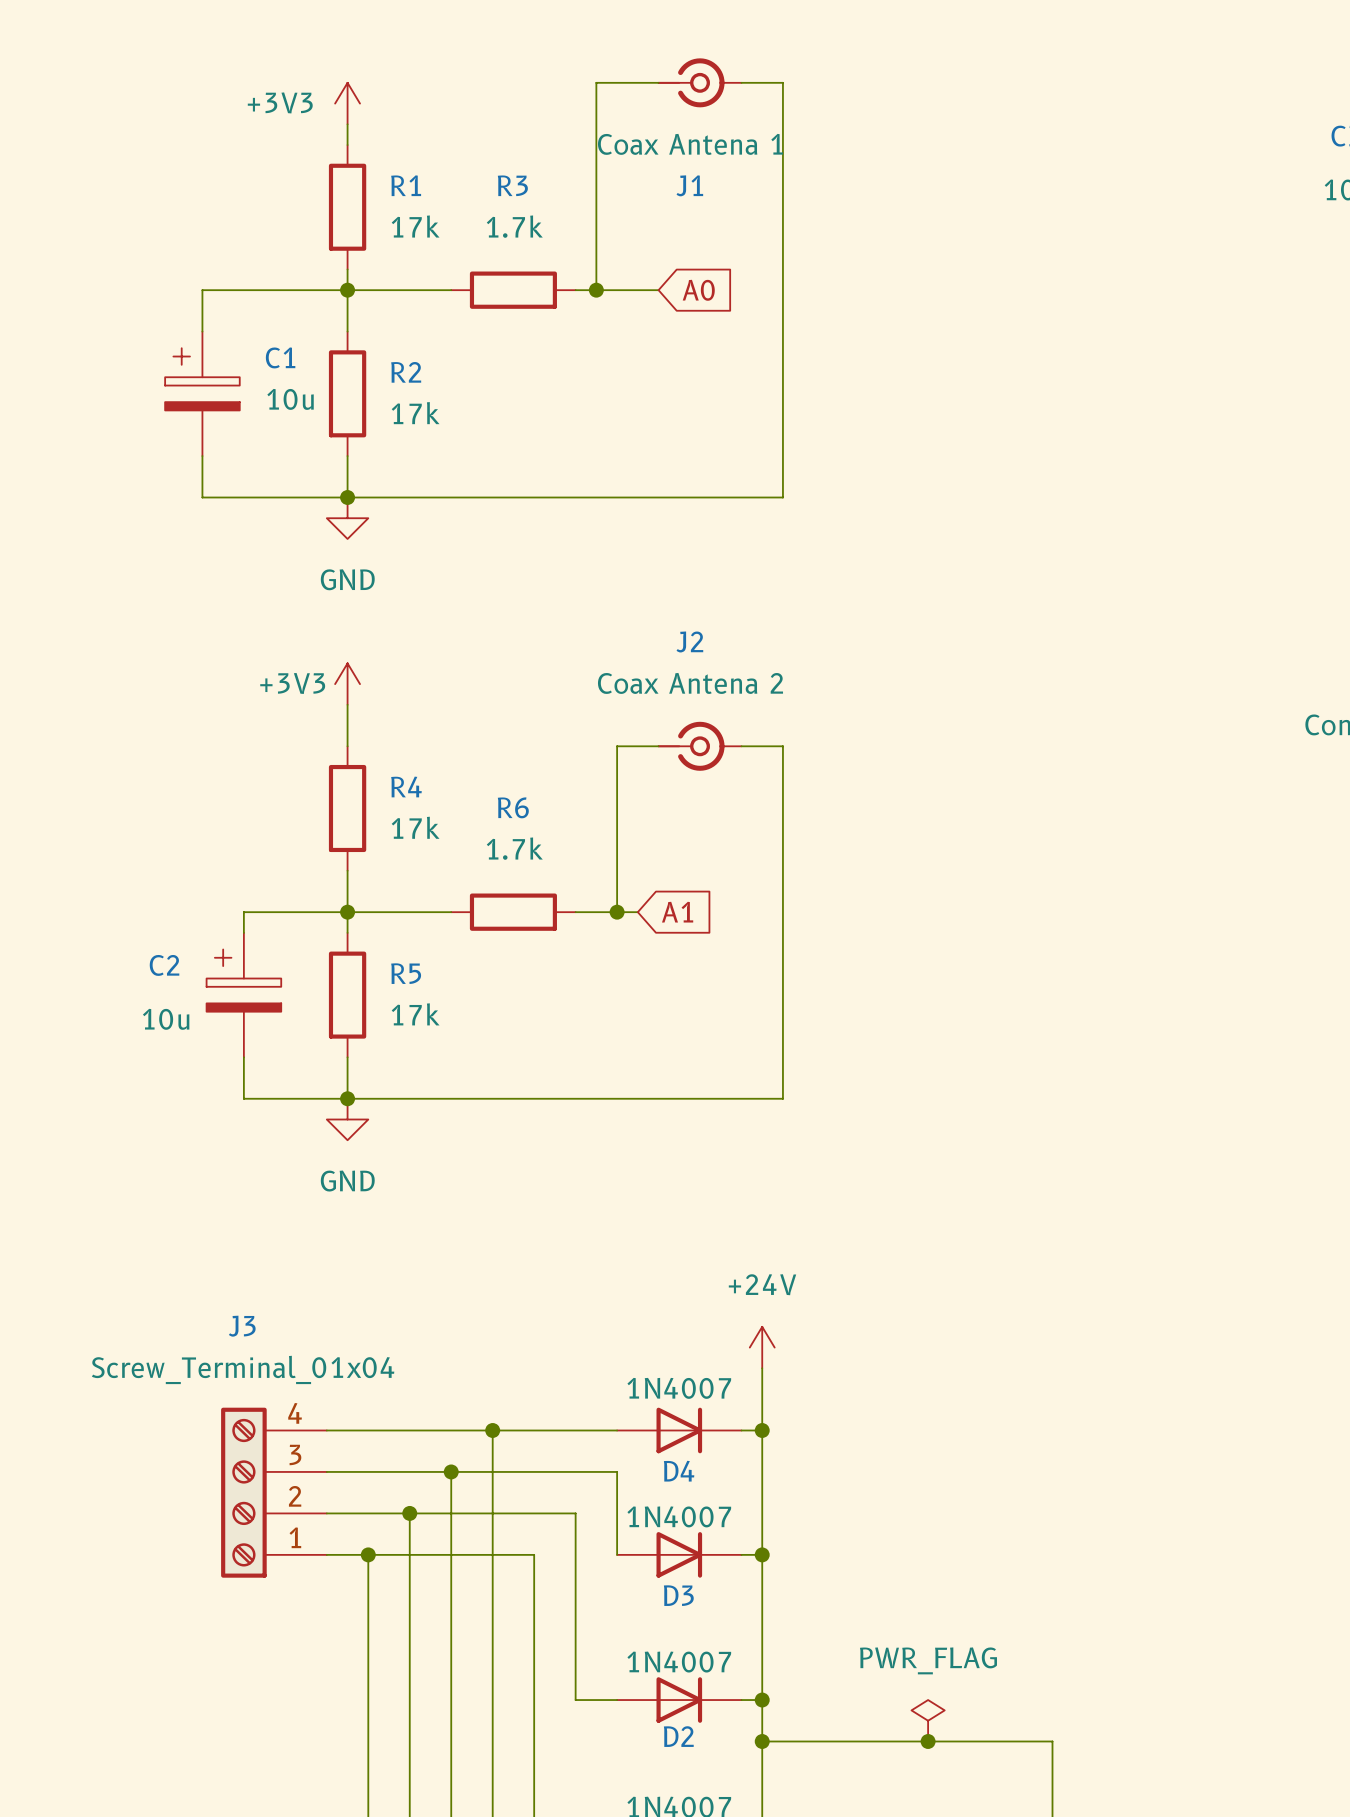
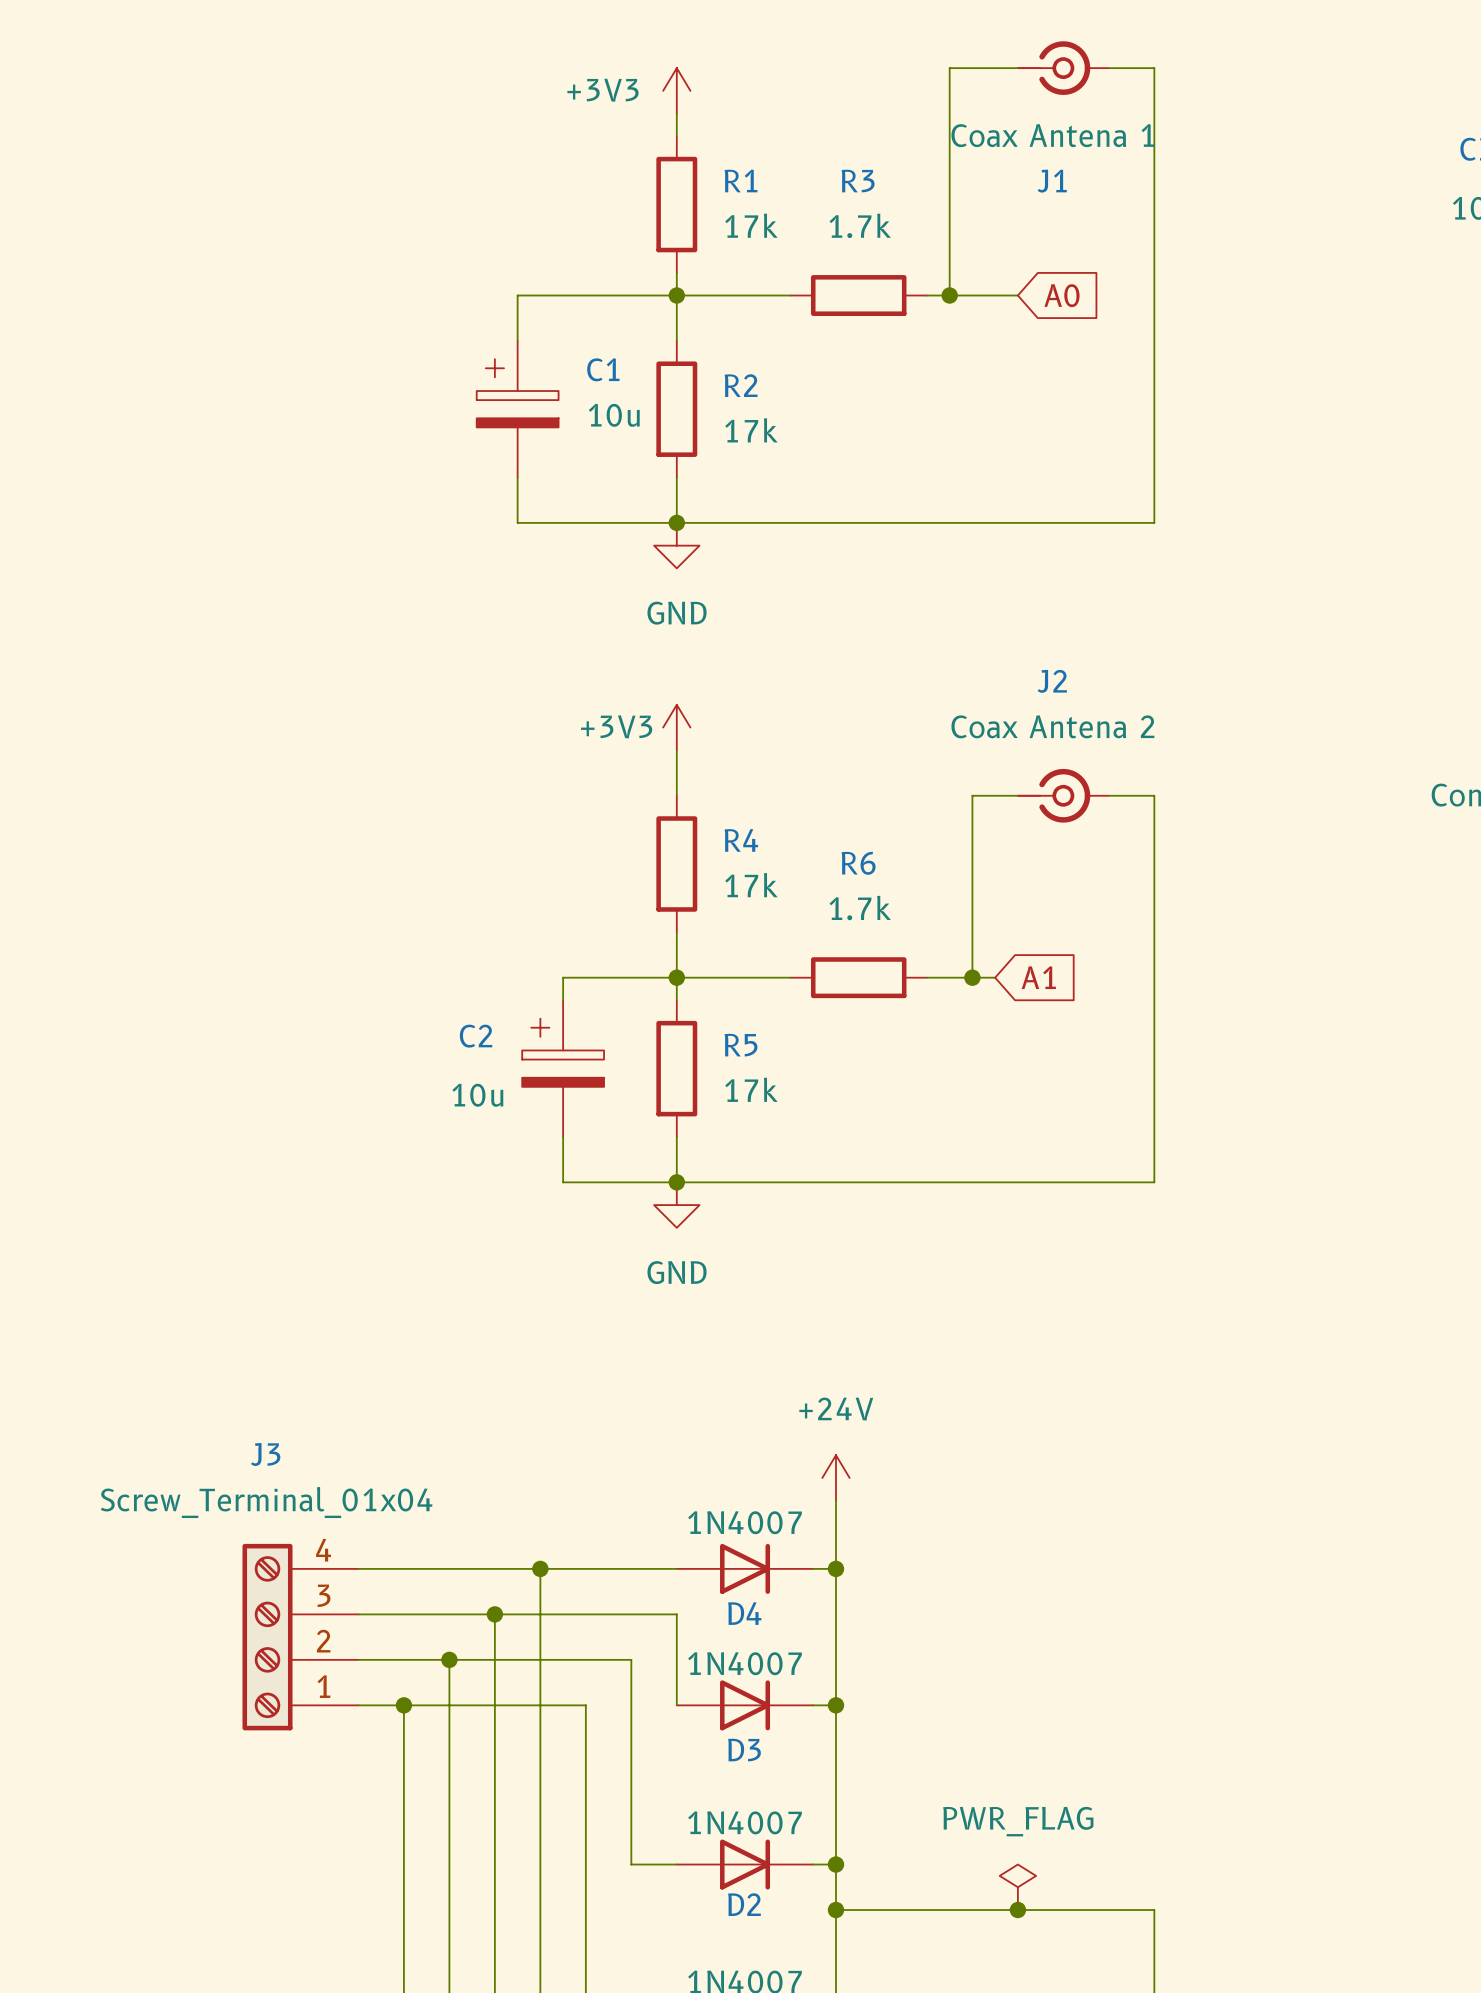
wire: (658, 82) (596, 82) (596, 290) -> (1017, 68) (949, 68) (949, 295)
J1 position: (700, 82) -> (1063, 68)
wire: (741, 82) (782, 82) (782, 497) (202, 497) (202, 456) -> (1108, 68) (1154, 68) (1154, 522) (517, 522) (517, 477)
power symbol position: +3V3 (347, 103) -> +3V3 (676, 90)
wire: (347, 124) (347, 145) -> (676, 113) (676, 136)
R1 position: (347, 207) -> (676, 204)
wire: (347, 269) (347, 331) -> (676, 272) (676, 340)
junction: none -> (949, 295)
junction: (347, 290) -> none
wire: (451, 290) (202, 290) (202, 331) -> (790, 295) (517, 295) (517, 340)
R3 position: (513, 290) -> (858, 295)
wire: (575, 290) (658, 290) -> (926, 295) (1017, 295)
junction position: (596, 290) -> (676, 295)
global label position: A0 (698, 290) -> A0 (1061, 295)
C1 position: (202, 393) -> (517, 409)
R2 position: (347, 393) -> (676, 409)
wire: (347, 456) (347, 497) -> (676, 477) (676, 522)
junction: none -> (676, 522)
junction: (347, 497) -> none
power symbol position: GND (347, 518) -> GND (676, 545)
power symbol position: +3V3 (347, 684) -> +3V3 (676, 727)
wire: (347, 704) (347, 746) -> (676, 750) (676, 795)
wire: none -> (1017, 795) (972, 795) (972, 977)
wire: (658, 746) (617, 746) (617, 849) -> none
J2 position: (700, 746) -> (1063, 795)
wire: (741, 746) (782, 746) (782, 1098) (243, 1098) (243, 1057) -> (1108, 795) (1154, 795) (1154, 1182) (563, 1182) (563, 1136)
R4 position: (347, 808) -> (676, 863)
wire: (347, 870) (347, 932) -> none
junction: none -> (972, 977)
junction: (347, 912) -> none
wire: (451, 912) (243, 912) (243, 932) -> (790, 977) (563, 977) (563, 1000)
R6 position: (513, 912) -> (858, 977)
wire: (575, 912) (637, 912) -> (926, 977) (995, 977)
junction position: (617, 912) -> (676, 977)
global label position: A1 (677, 912) -> A1 (1038, 977)
C2 position: (243, 995) -> (563, 1068)
R5 position: (347, 995) -> (676, 1068)
wire: (347, 1057) (347, 1098) -> (676, 1136) (676, 1182)
junction: none -> (676, 1182)
junction: (347, 1098) -> none
power symbol position: GND (347, 1119) -> GND (676, 1205)

